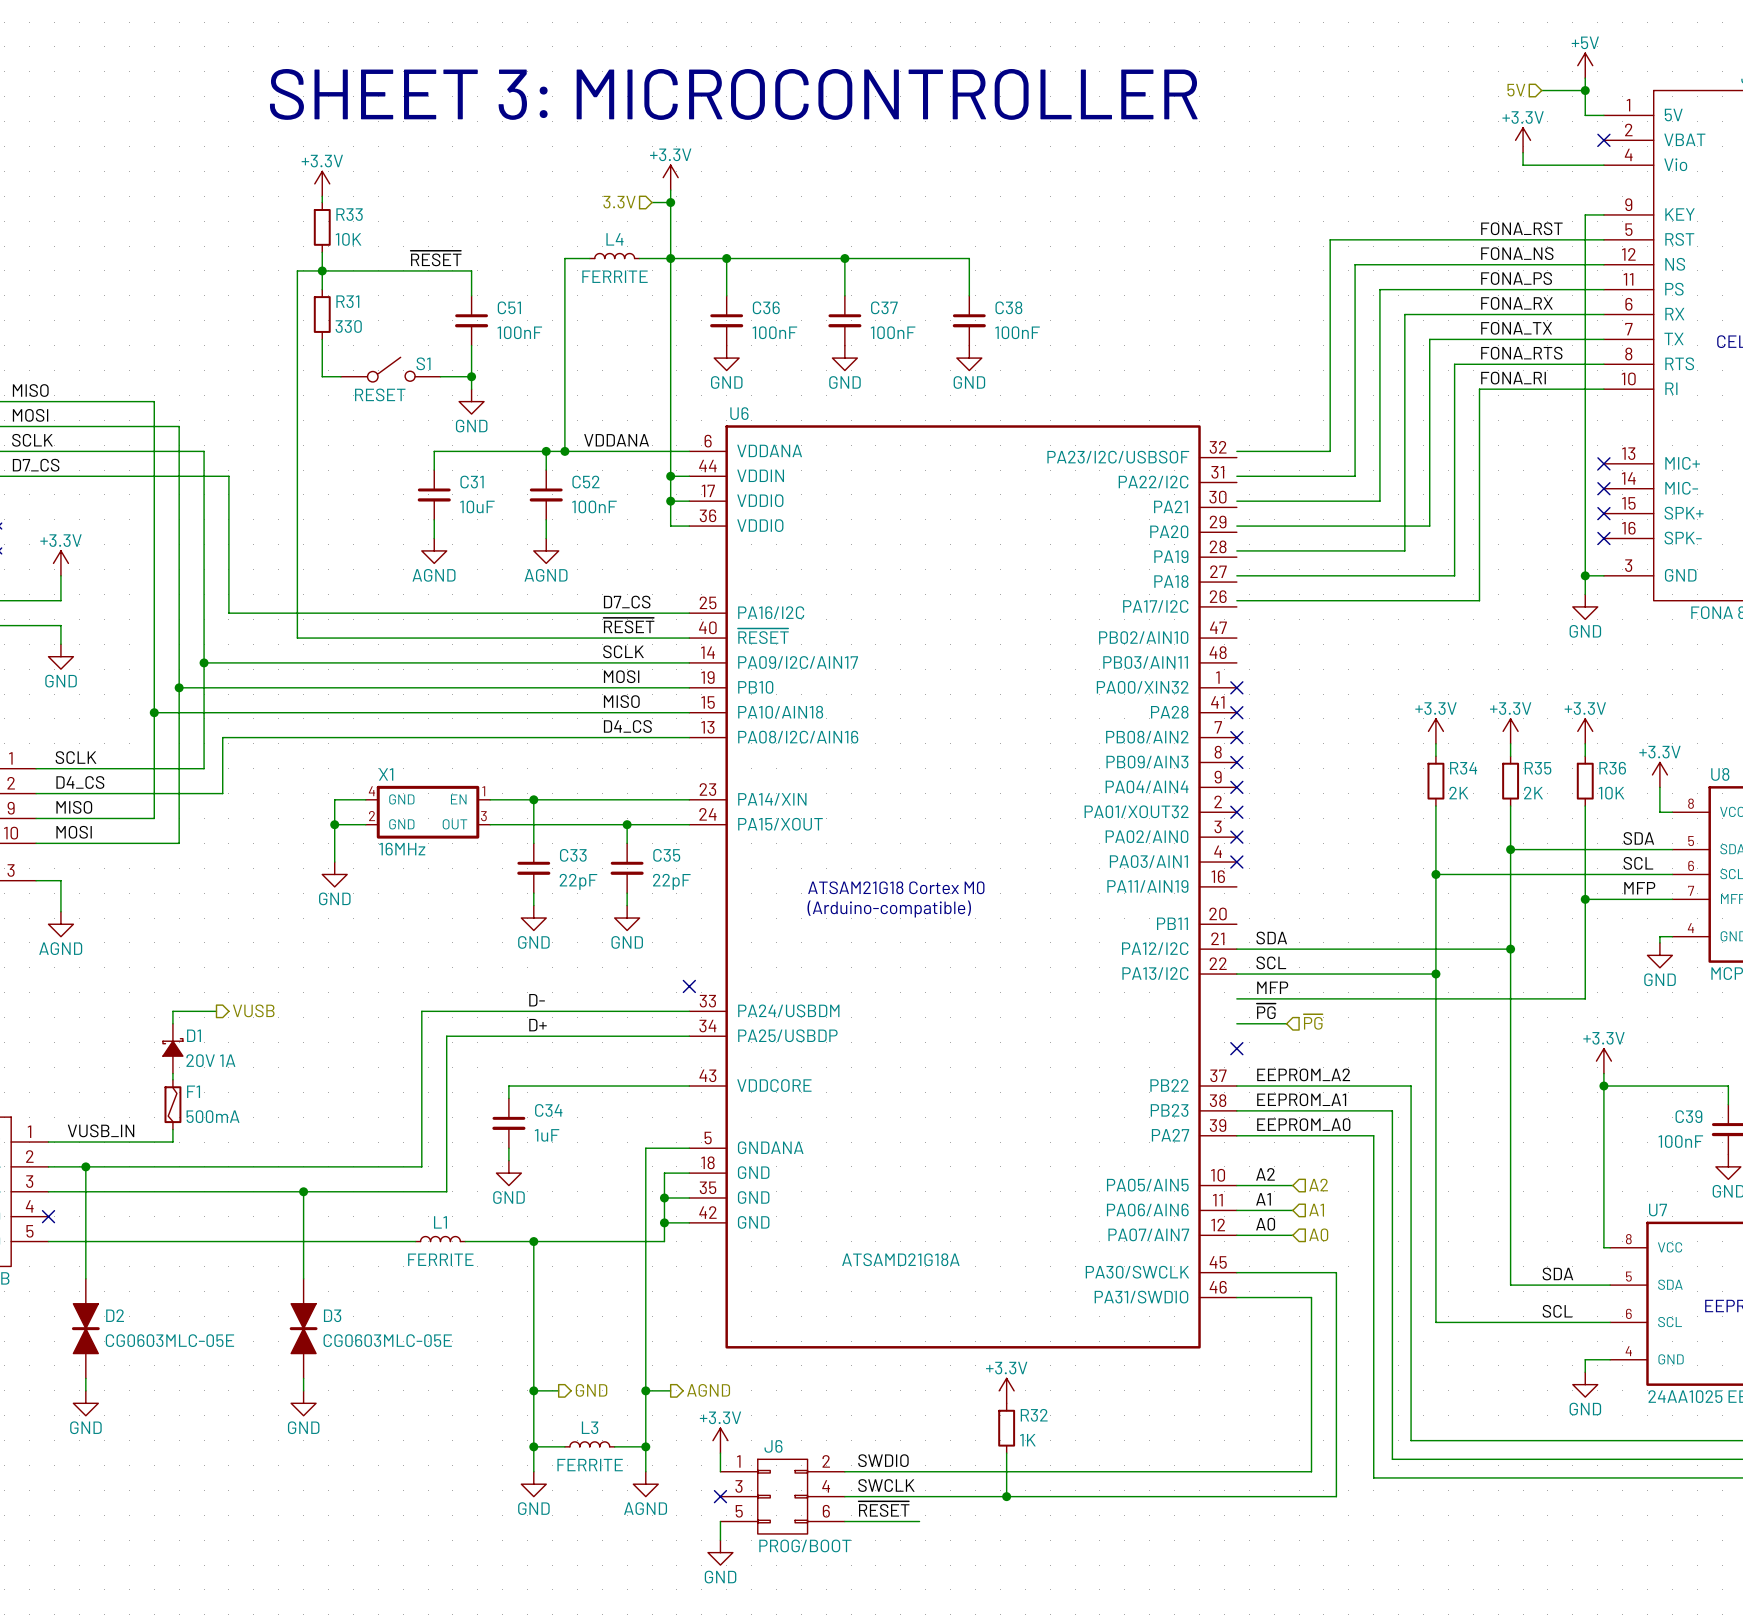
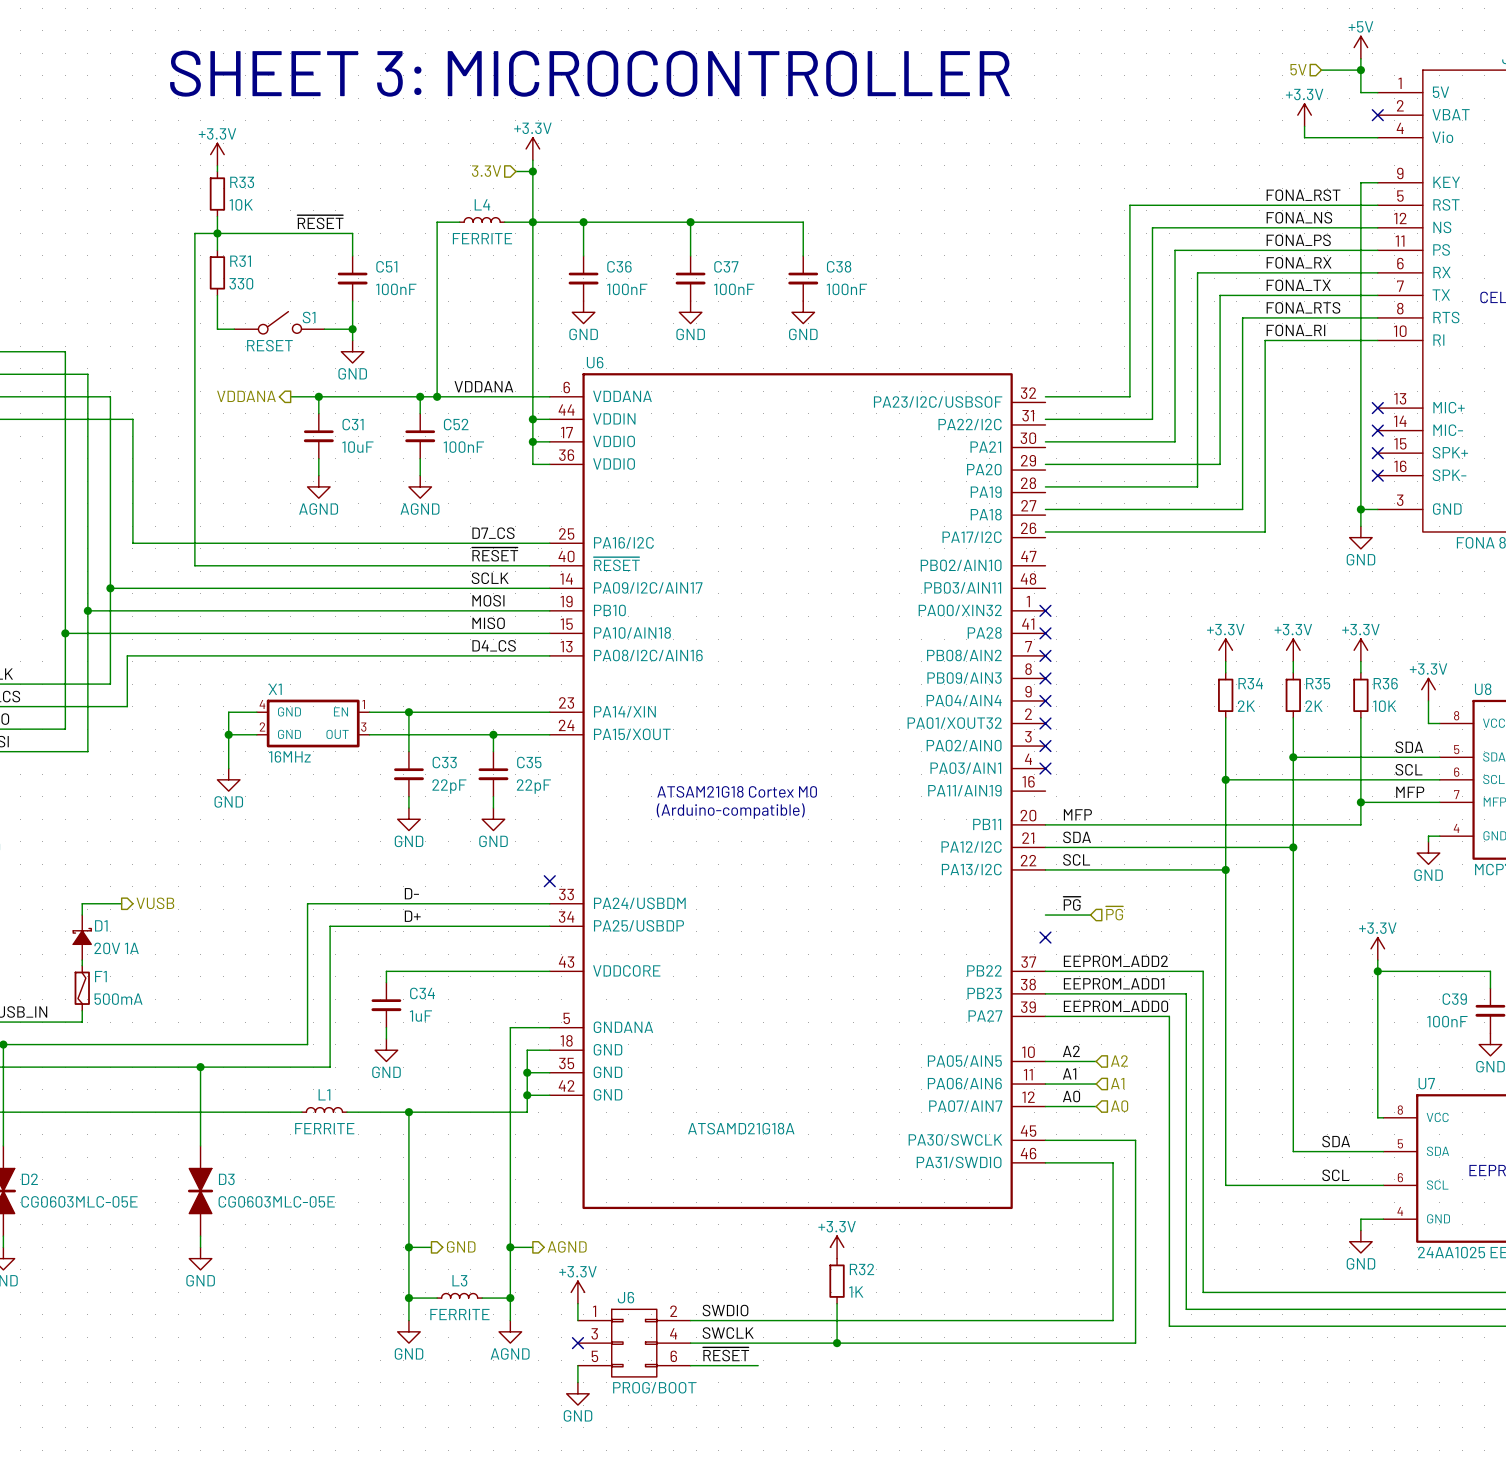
hierarchical label: none -> VDDANA (246, 396)
wire: none -> (290, 396) (318, 396)
junction: none -> (318, 396)
wire: (1585, 924) (1585, 998) (1236, 998) -> (1360, 824) (1045, 824)
label position: MFP (1272, 987) -> MFP (1077, 814)
label: EEPROM_A2 (1303, 1074) -> EEPROM_ADD2 (1115, 961)
label: EEPROM_A1 (1301, 1099) -> EEPROM_ADD1 (1114, 983)
label: EEPROM_A0 (1303, 1124) -> EEPROM_ADD0 (1115, 1006)

